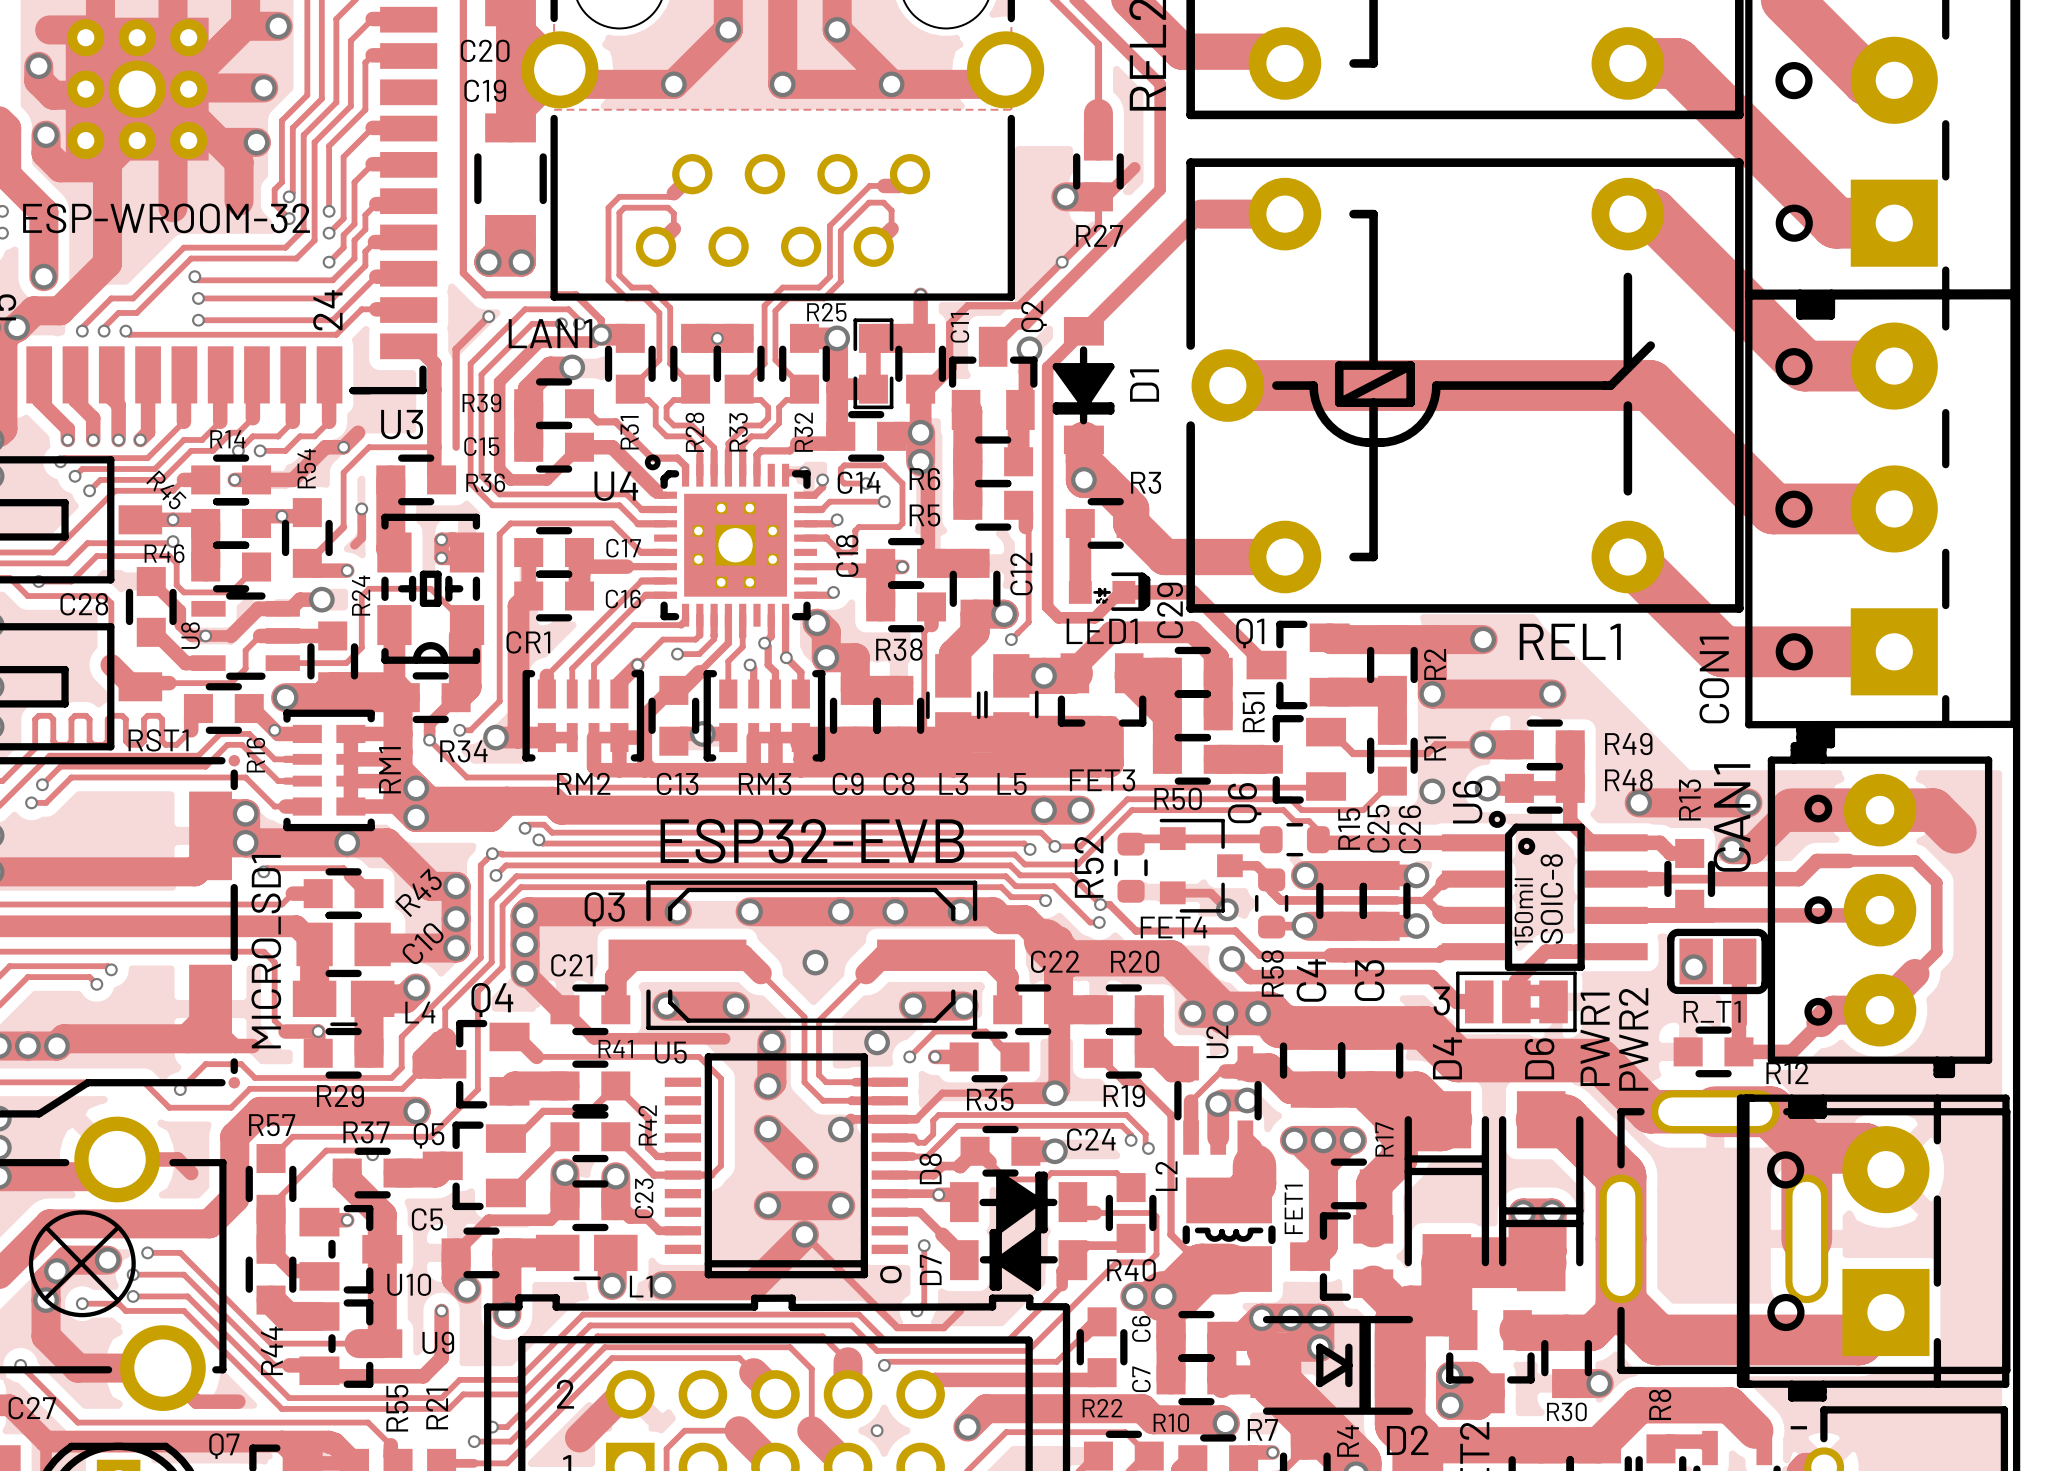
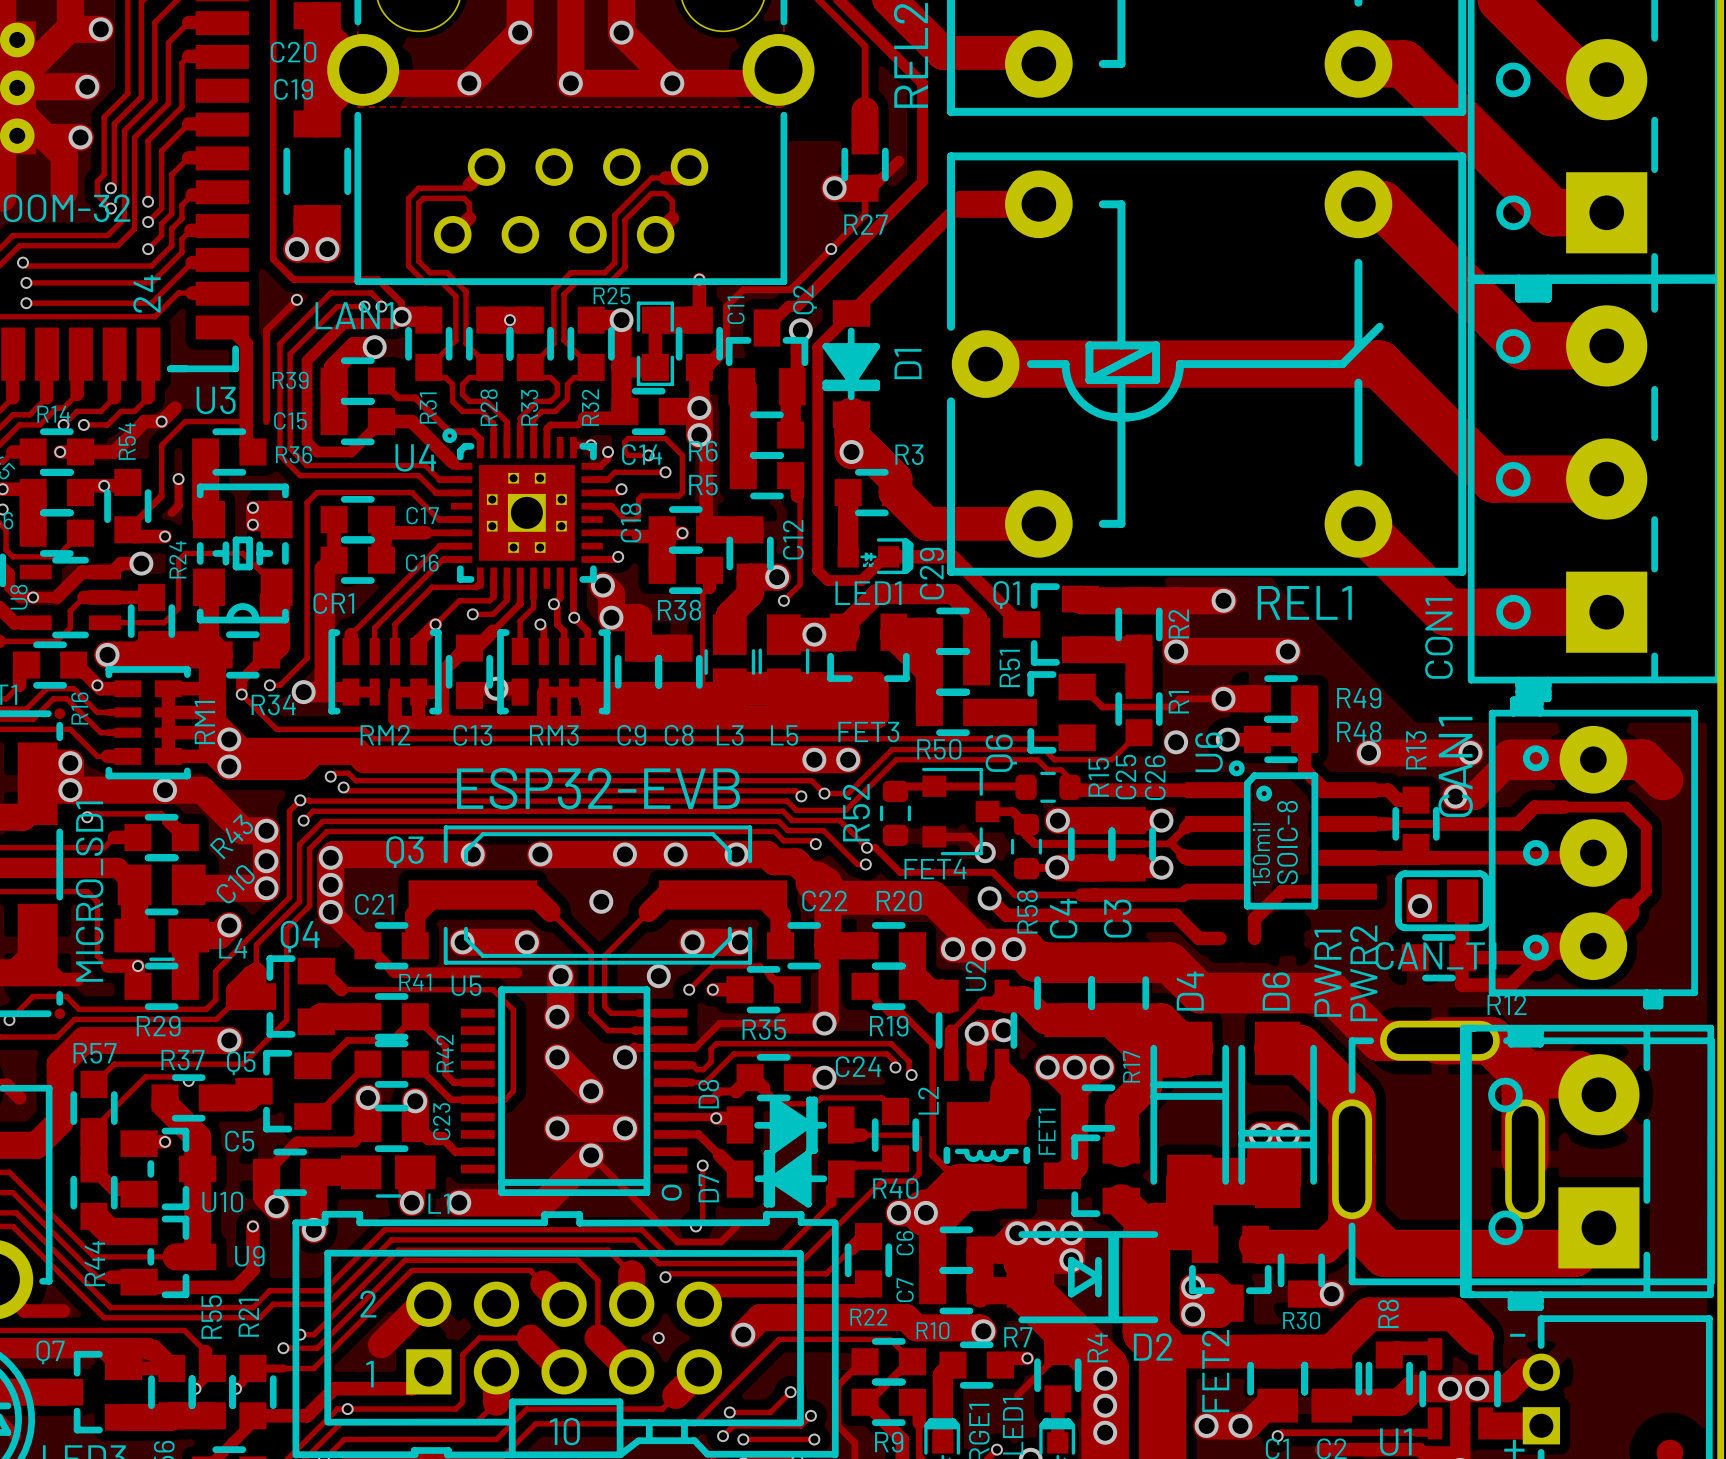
part: (1516, 1001) -> none
R_T1 name: R_T1 (1712, 1011) -> CAN_T1 (1436, 955)
track: none -> (1462, 957) (1538, 957)
R12 position: (1713, 1051) -> (1438, 957)

